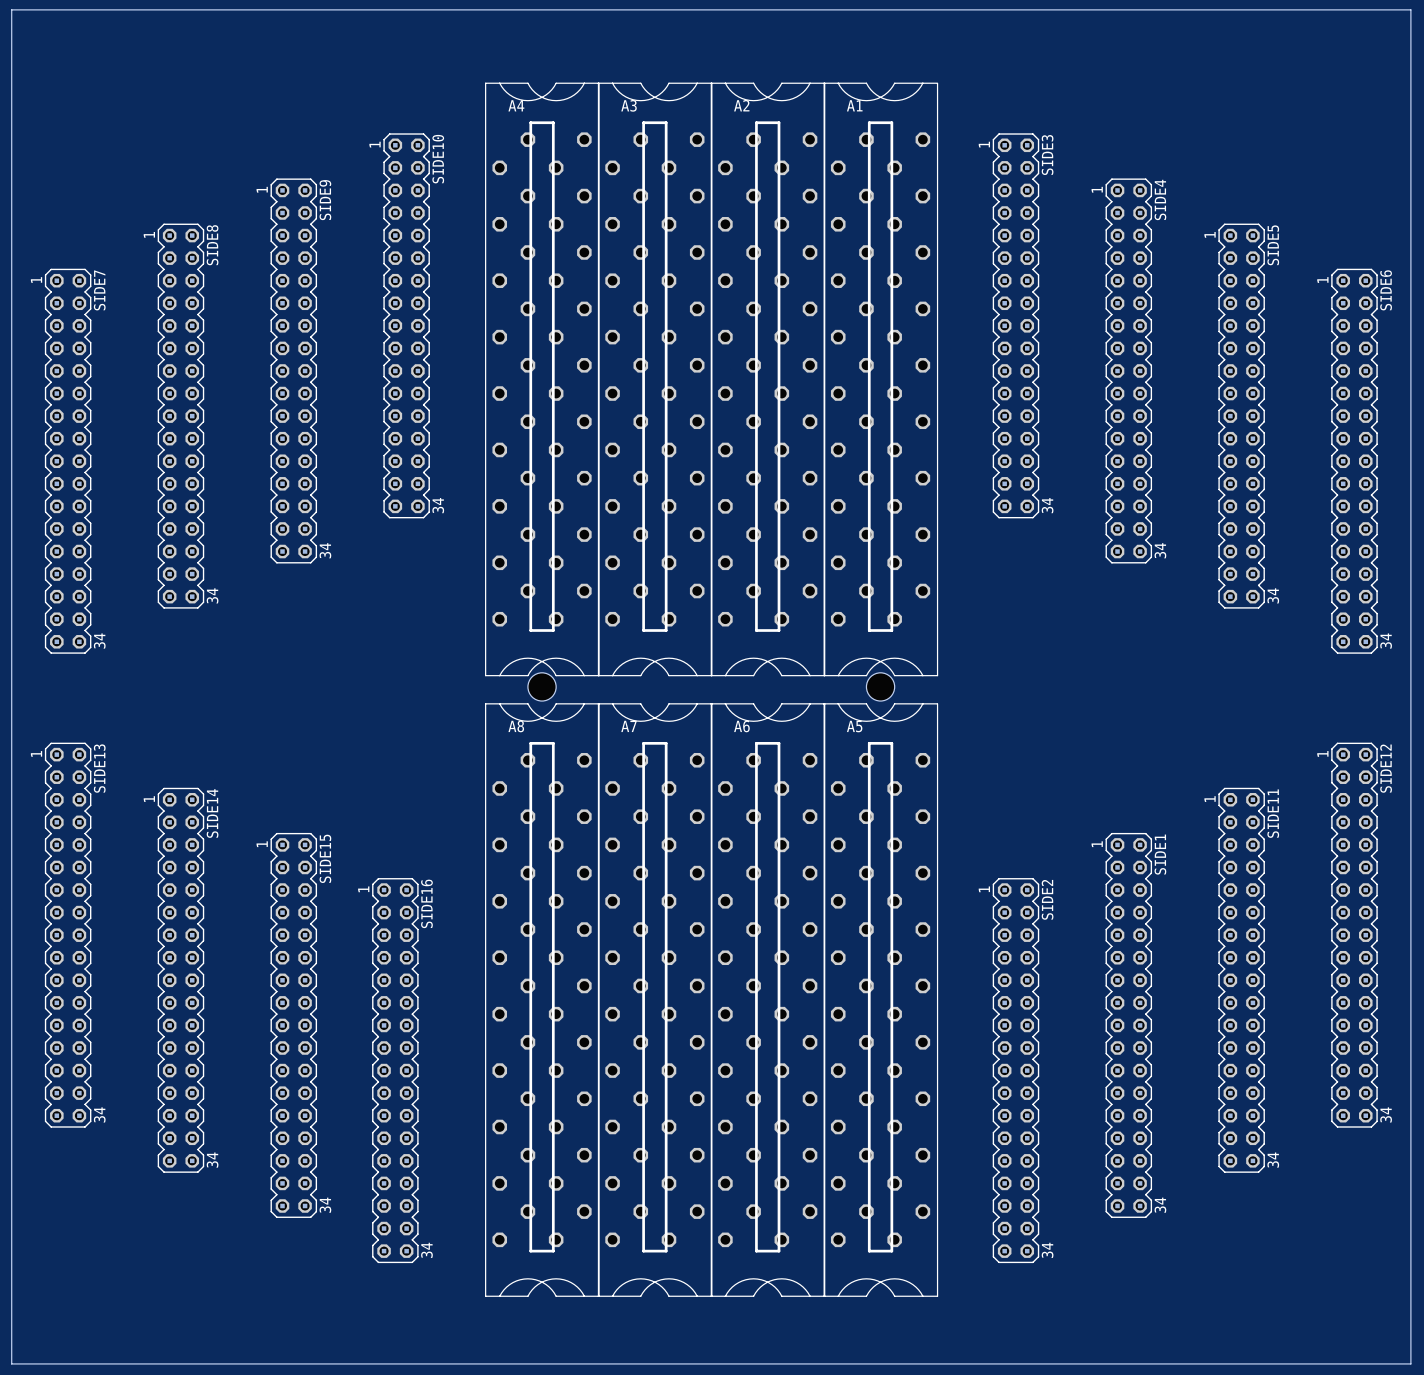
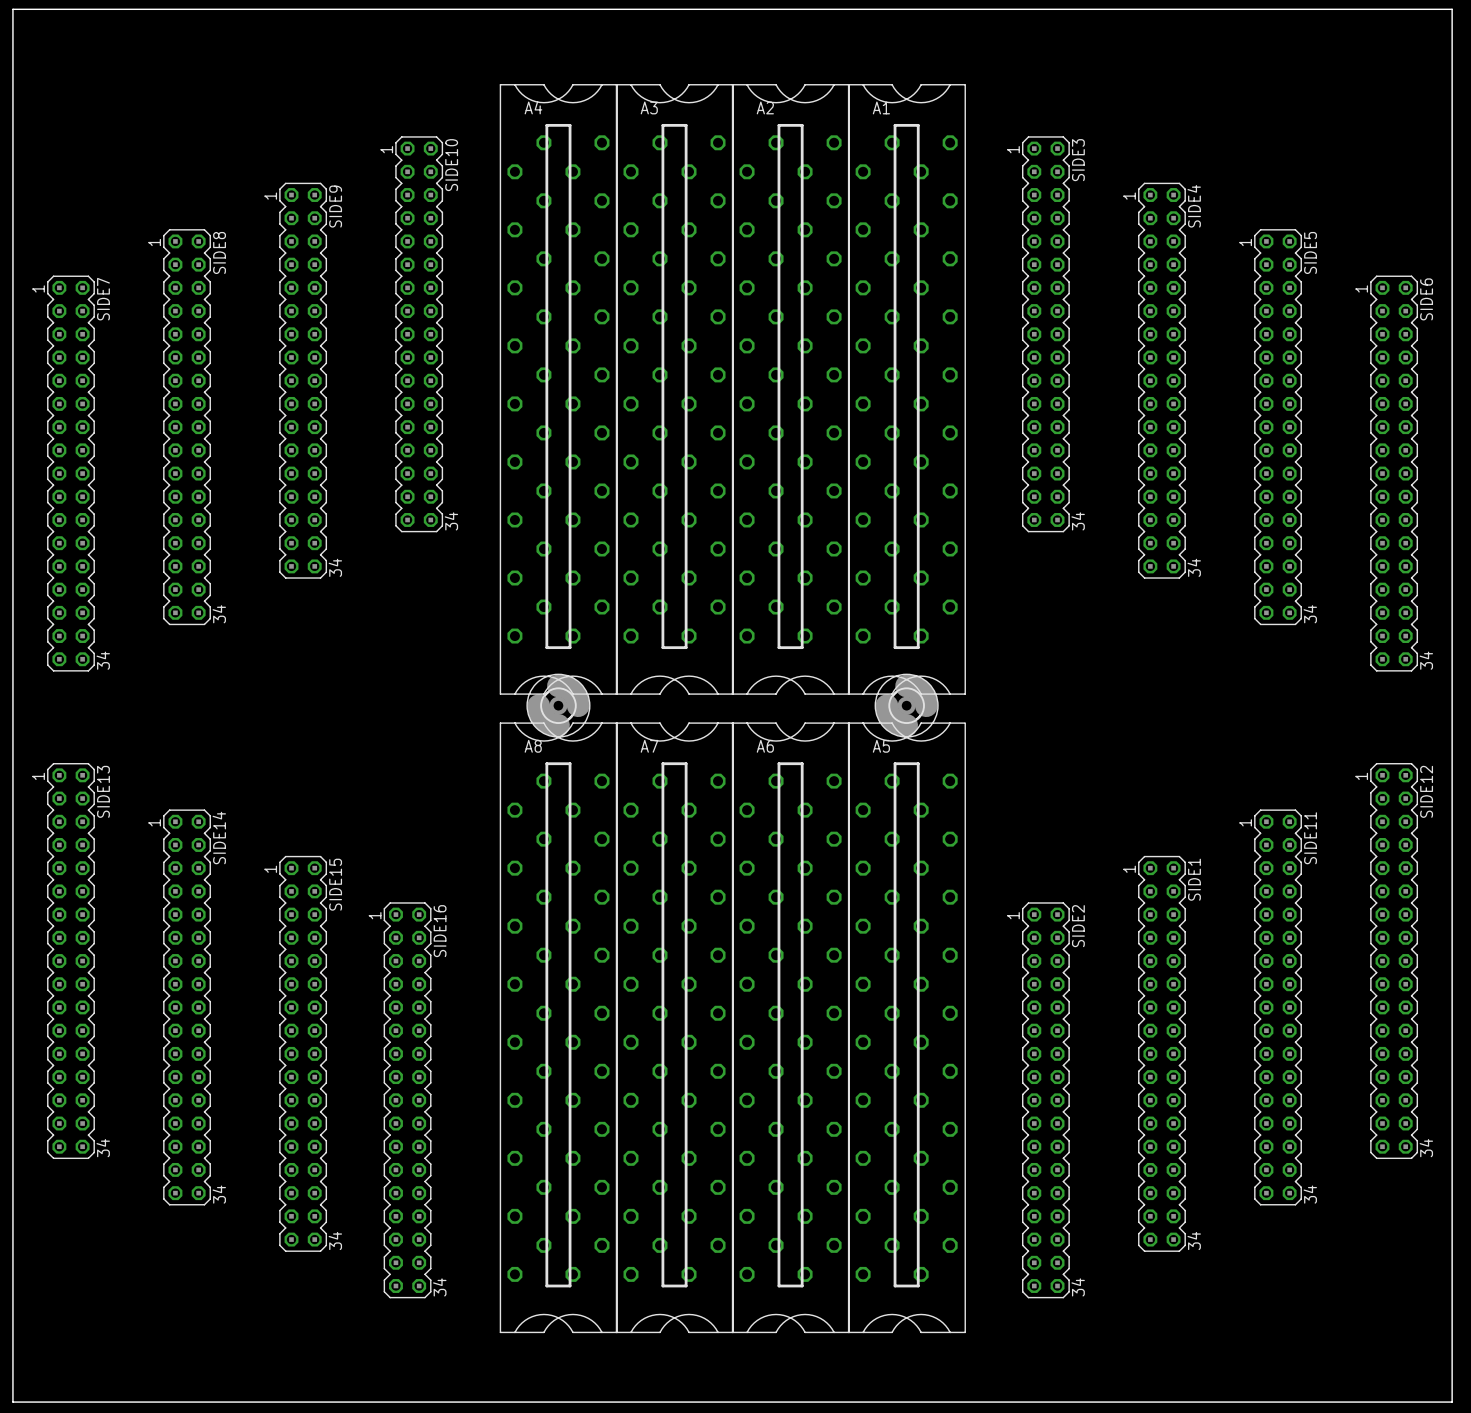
hole: (542, 686) -> none
part: none -> (558, 705)
hole: (880, 686) -> none
part: none -> (906, 705)

